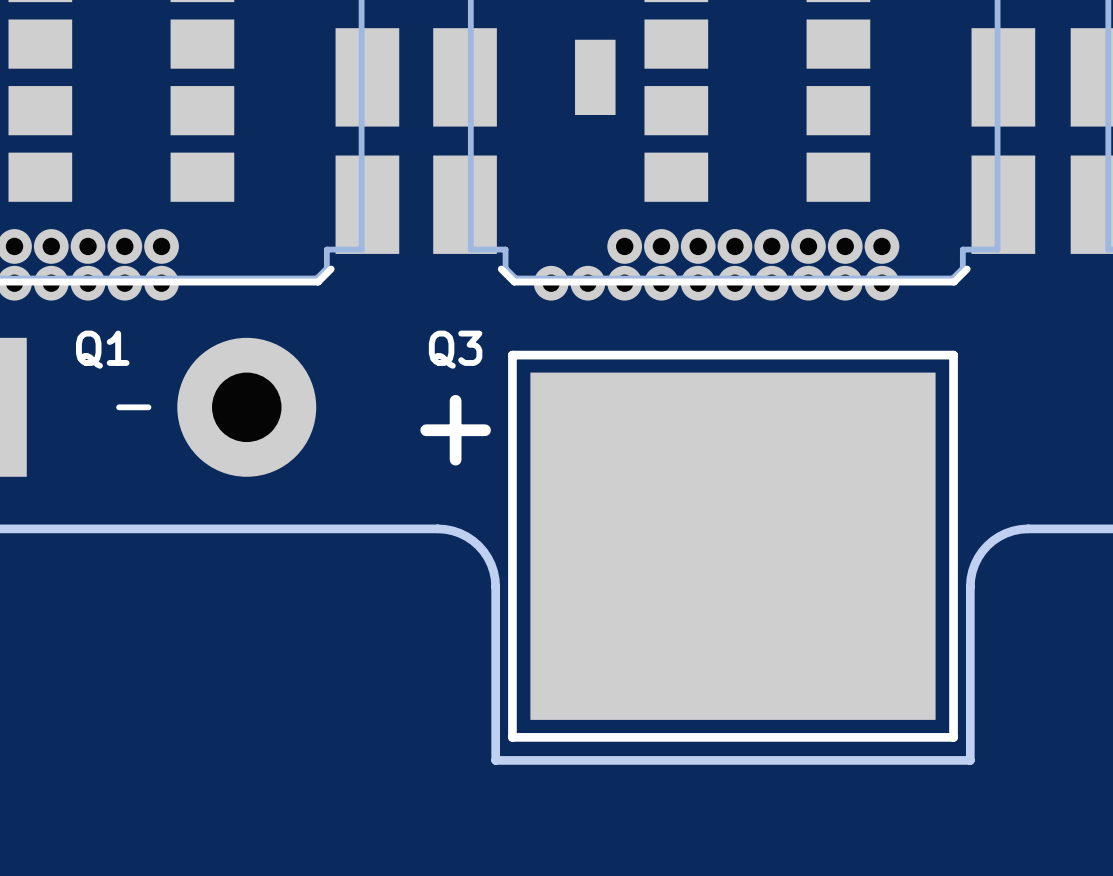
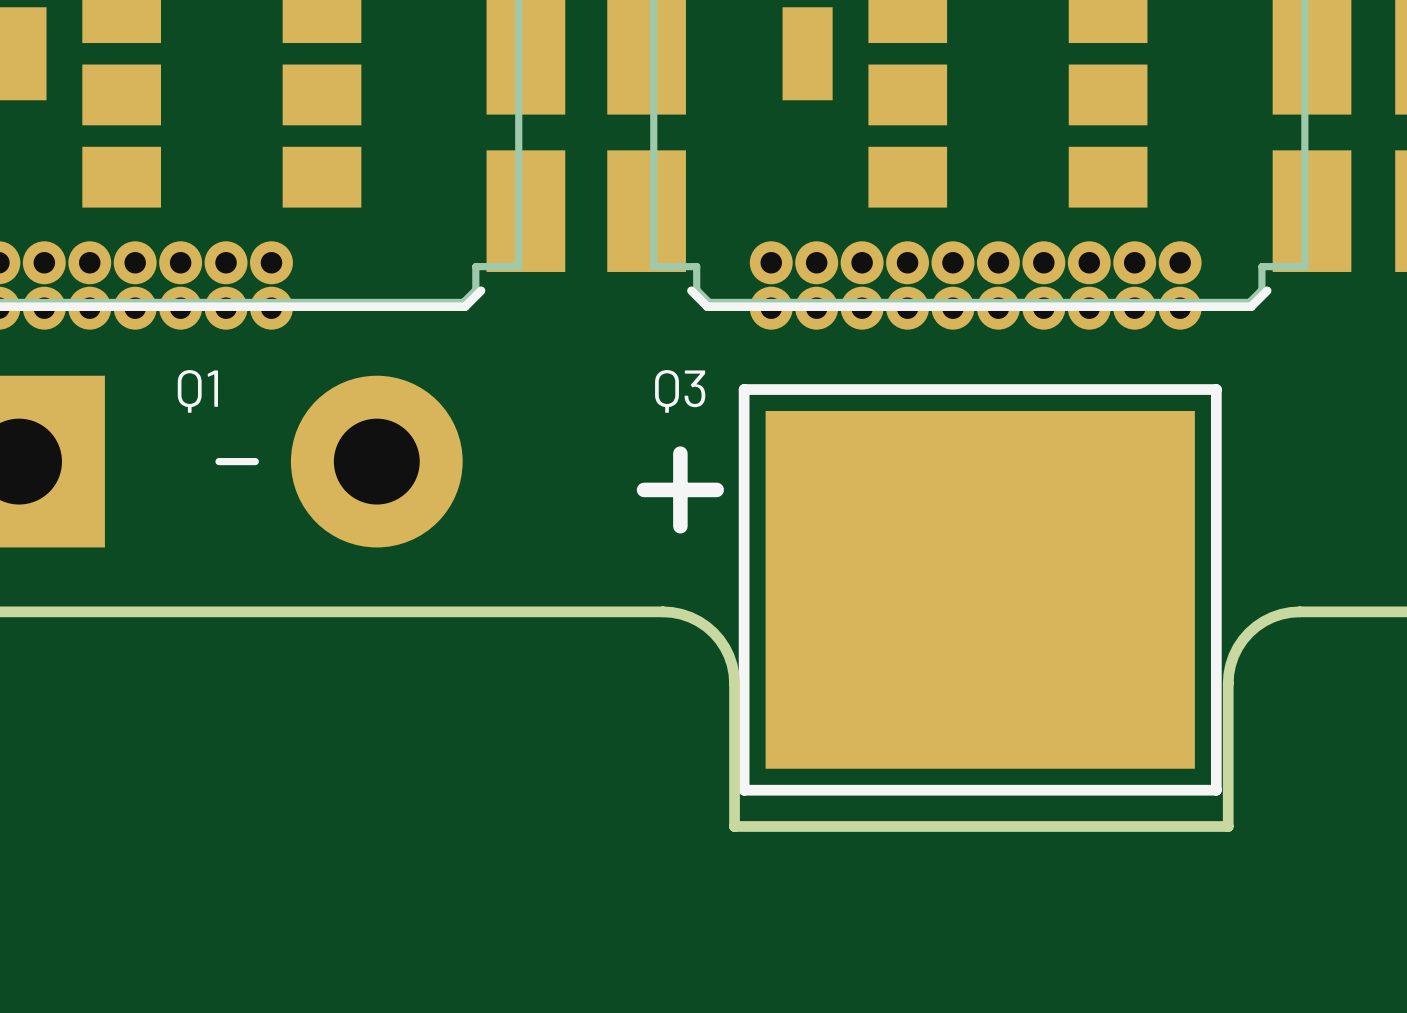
part: none -> (771, 262)
part: none -> (816, 262)
part: (624, 246) -> none
part: none -> (862, 262)
part: (661, 246) -> none
part: none -> (907, 262)
part: (698, 246) -> none
part: none -> (952, 262)
part: (734, 246) -> none
part: none -> (998, 262)
part: (771, 246) -> none
part: none -> (1043, 262)
part: (808, 246) -> none
part: none -> (1089, 262)
part: (845, 246) -> none
part: none -> (1134, 262)
part: (881, 246) -> none
part: none -> (1180, 262)
part: (551, 283) -> none
part: none -> (771, 308)
part: (587, 283) -> none
part: none -> (816, 308)
part: (624, 283) -> none
part: none -> (862, 308)
part: (661, 283) -> none
part: none -> (907, 308)
part: (698, 283) -> none
part: none -> (952, 308)
part: (734, 283) -> none
part: none -> (998, 308)
part: (771, 283) -> none
part: none -> (1043, 308)
part: (808, 283) -> none
part: none -> (1089, 308)
part: (845, 283) -> none
part: none -> (1134, 308)
part: (881, 283) -> none
part: none -> (1180, 308)
Q3 name position: Q3 (455, 349) -> Q3 (680, 391)
part footprint: [508, 350, 958, 742] -> [738, 384, 1222, 796]
line: (455, 400) (455, 459) -> (680, 453) (680, 526)
line: (426, 430) (462, 430) -> (671, 489) (716, 489)
board edge: (437, 528) (459, 533) (473, 540) (483, 551) (493, 571) (495, 586) (495, 760) (970, 760) (970, 586) (972, 571) (982, 551) (992, 540) (1006, 533) (1028, 528) -> (612, 611) (662, 611) (681, 614) (706, 626) (724, 647) (732, 664) (734, 683) (734, 826) (1228, 826) (1228, 683) (1230, 664) (1237, 647) (1249, 632) (1272, 617) (1290, 612) (1342, 611)

